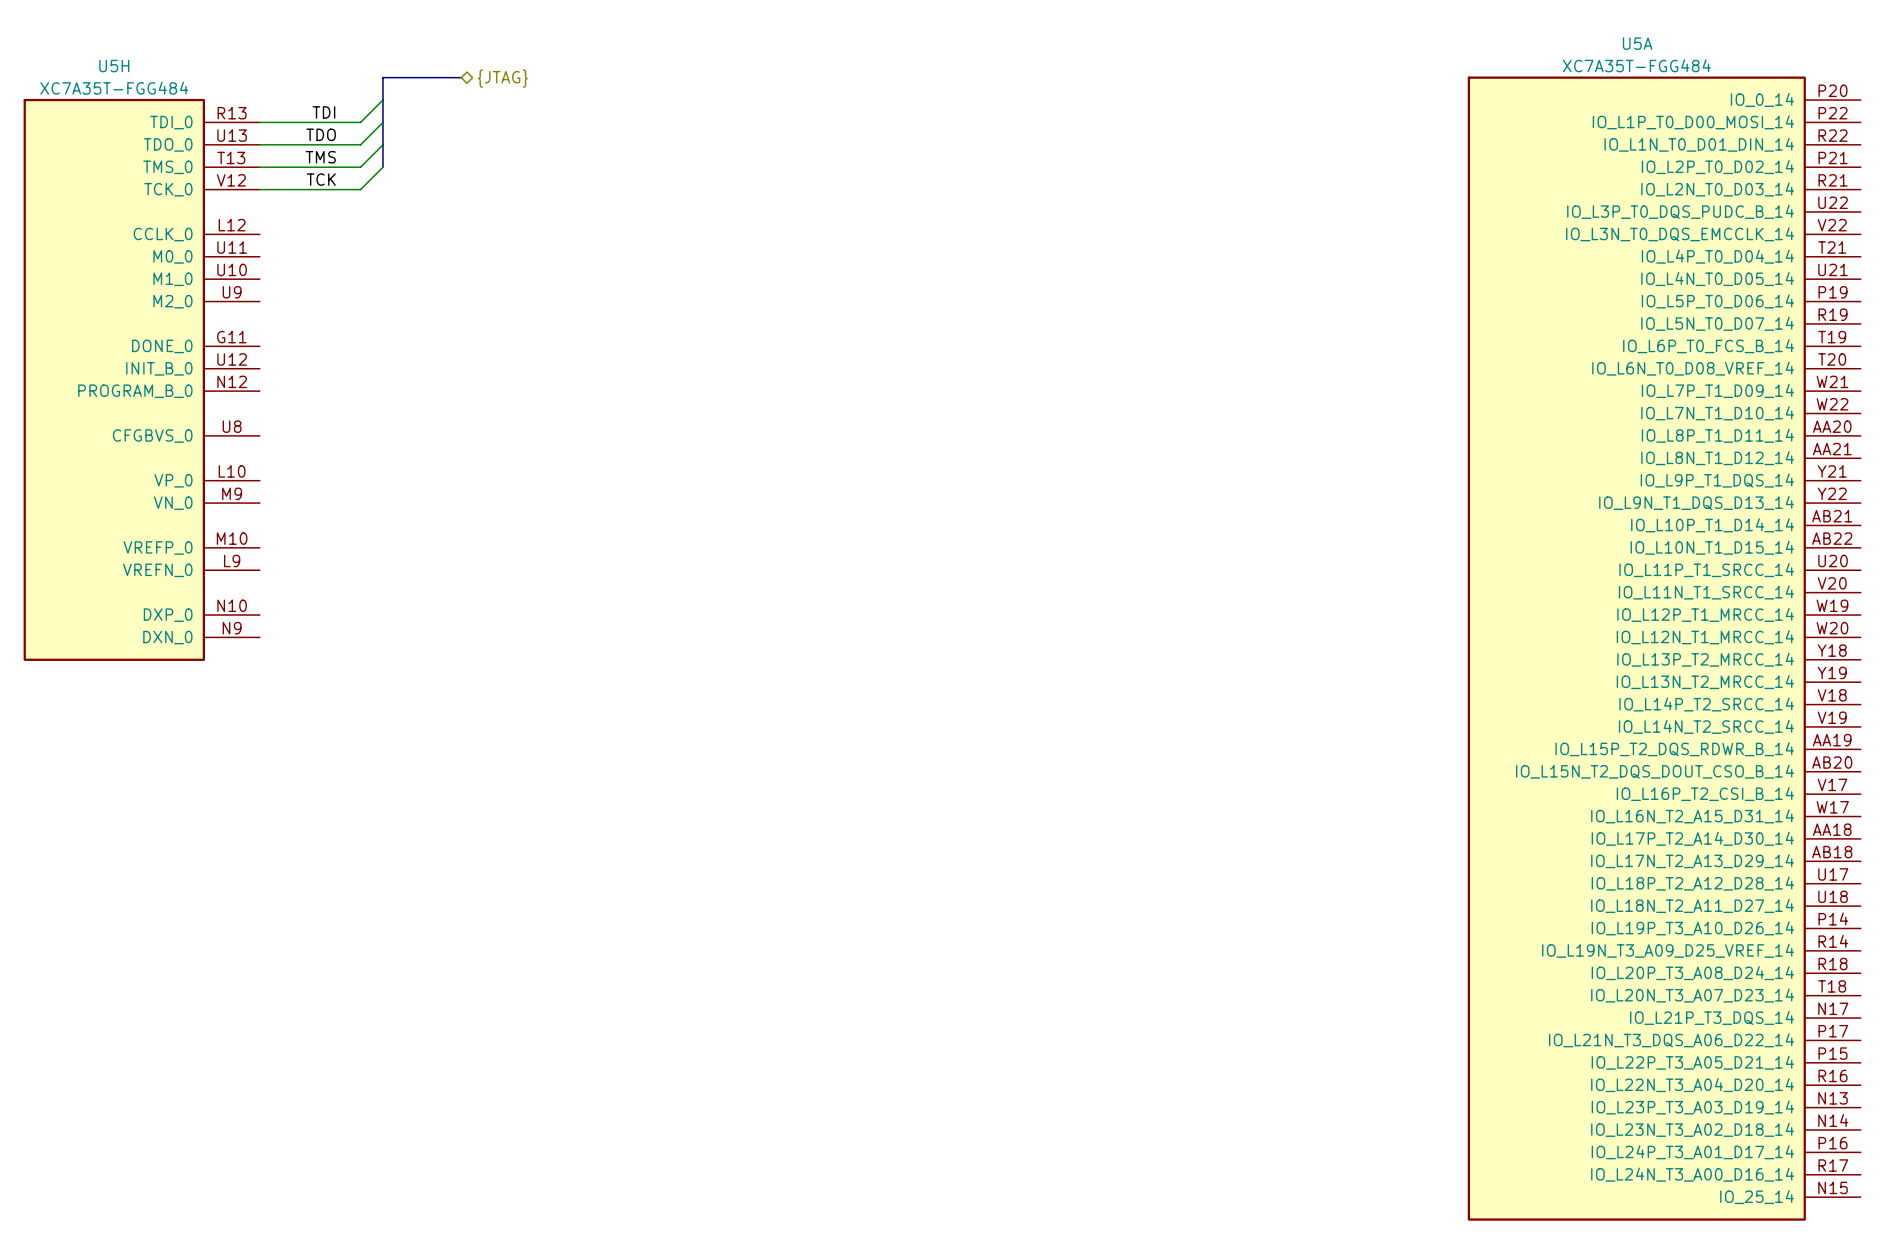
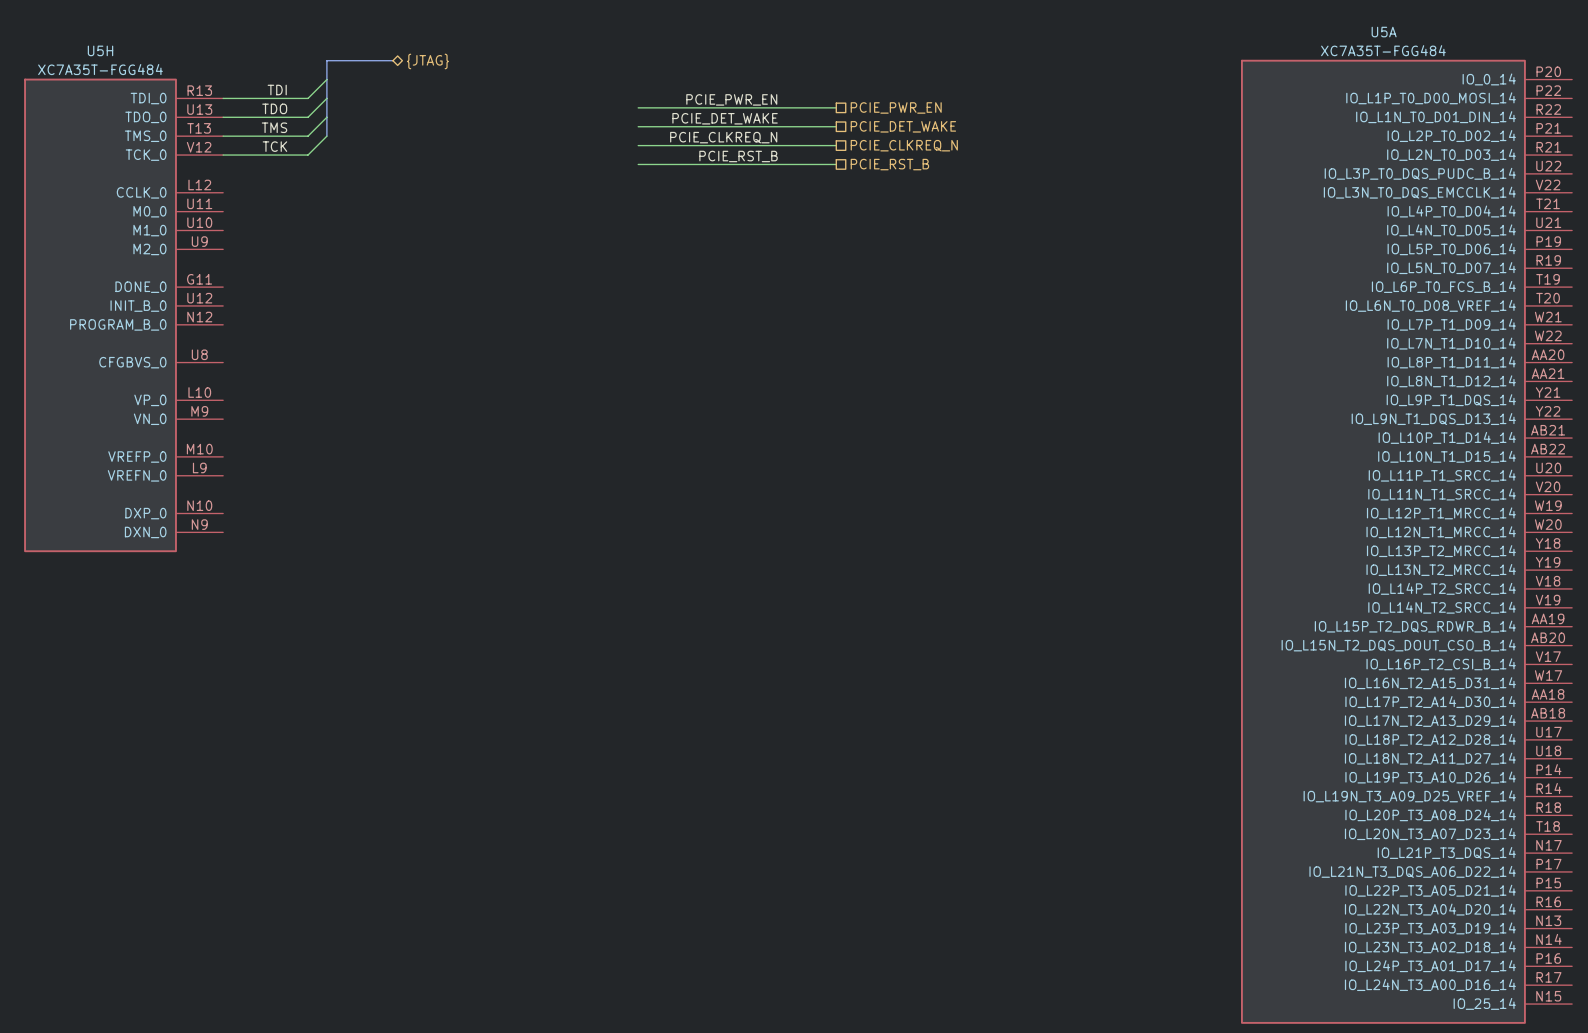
label: none -> PCIE_PWR_EN (731, 99)
wire: none -> (638, 107) (836, 107)
hierarchical label: none -> PCIE_PWR_EN (896, 107)
label: none -> PCIE_DET_WAKE (725, 118)
wire: none -> (638, 126) (836, 126)
hierarchical label: none -> PCIE_DET_WAKE (903, 126)
label: none -> PCIE_CLKREQ_N (723, 137)
wire: none -> (638, 145) (836, 145)
hierarchical label: none -> PCIE_CLKREQ_N (904, 145)
label: none -> PCIE_RST_B (738, 156)
wire: none -> (638, 164) (836, 164)
hierarchical label: none -> PCIE_RST_B (889, 164)

